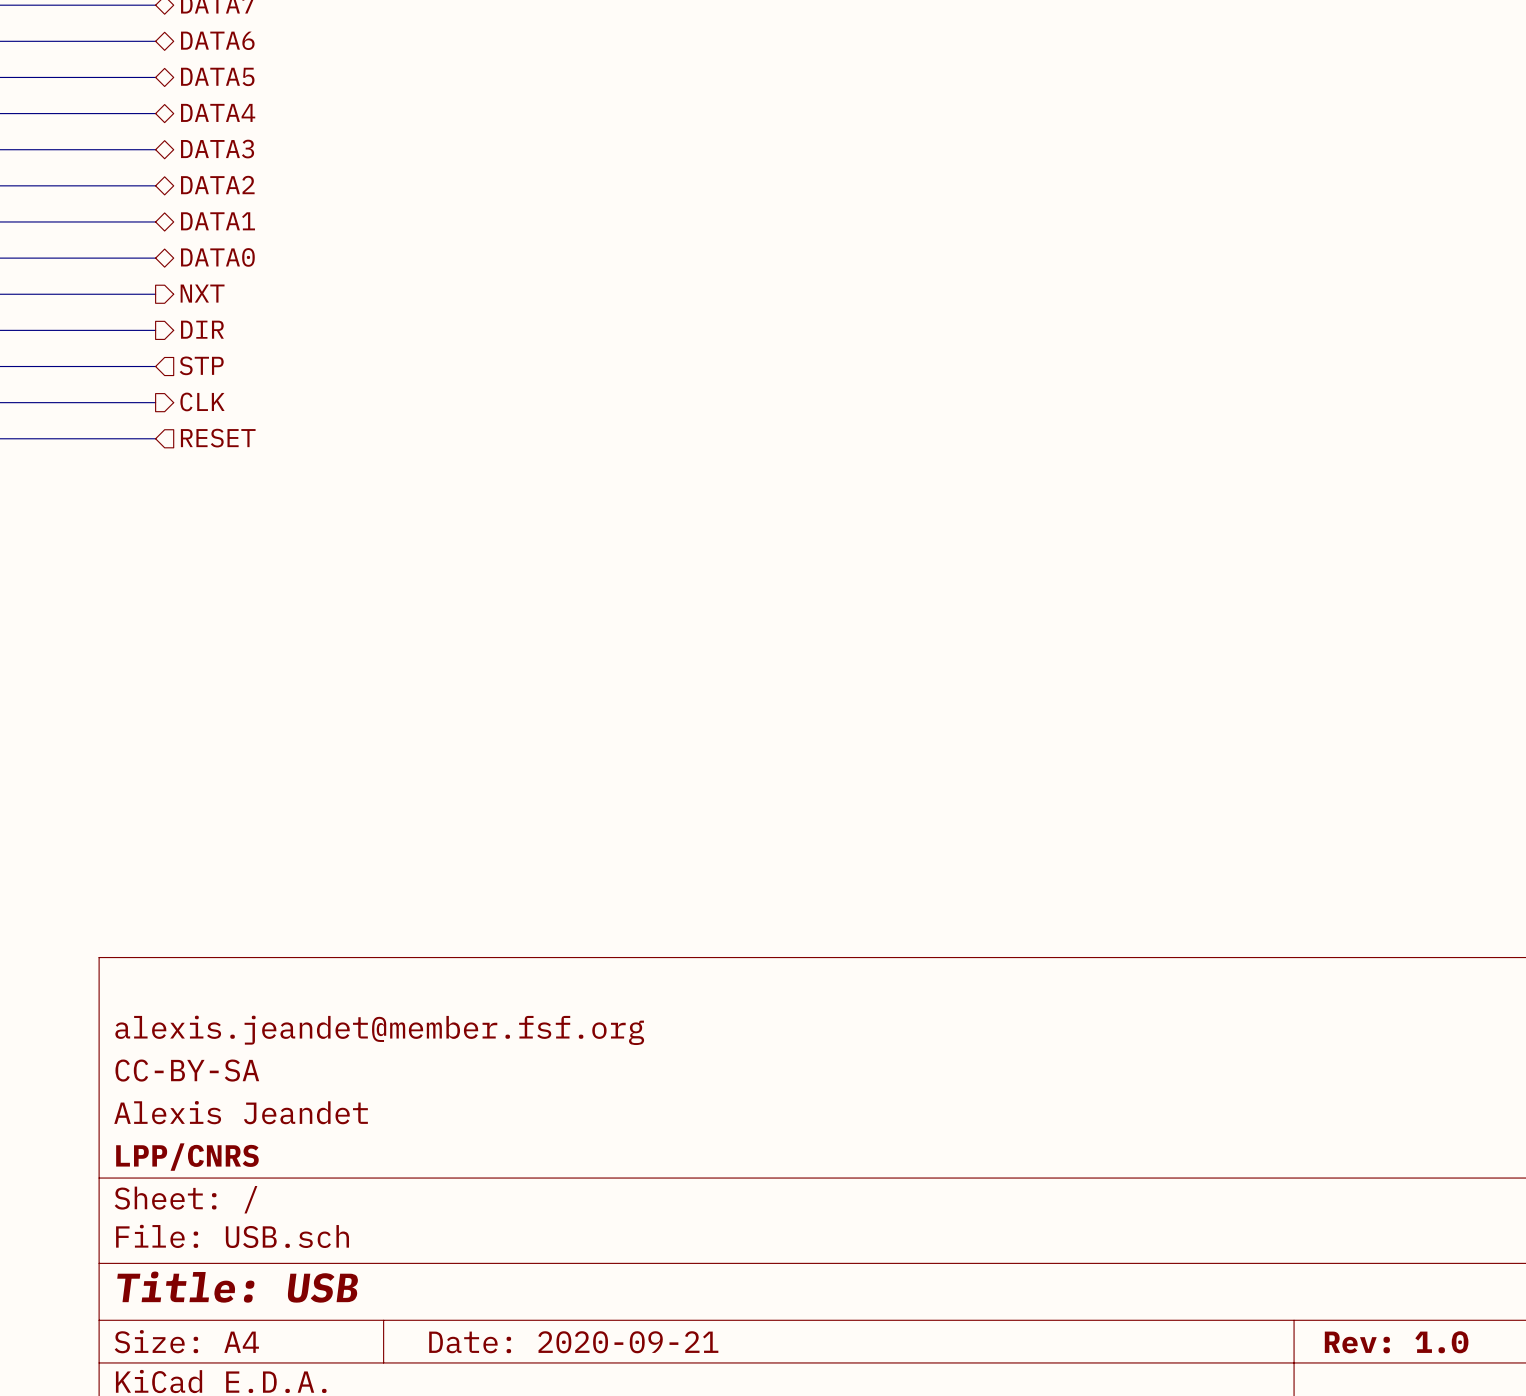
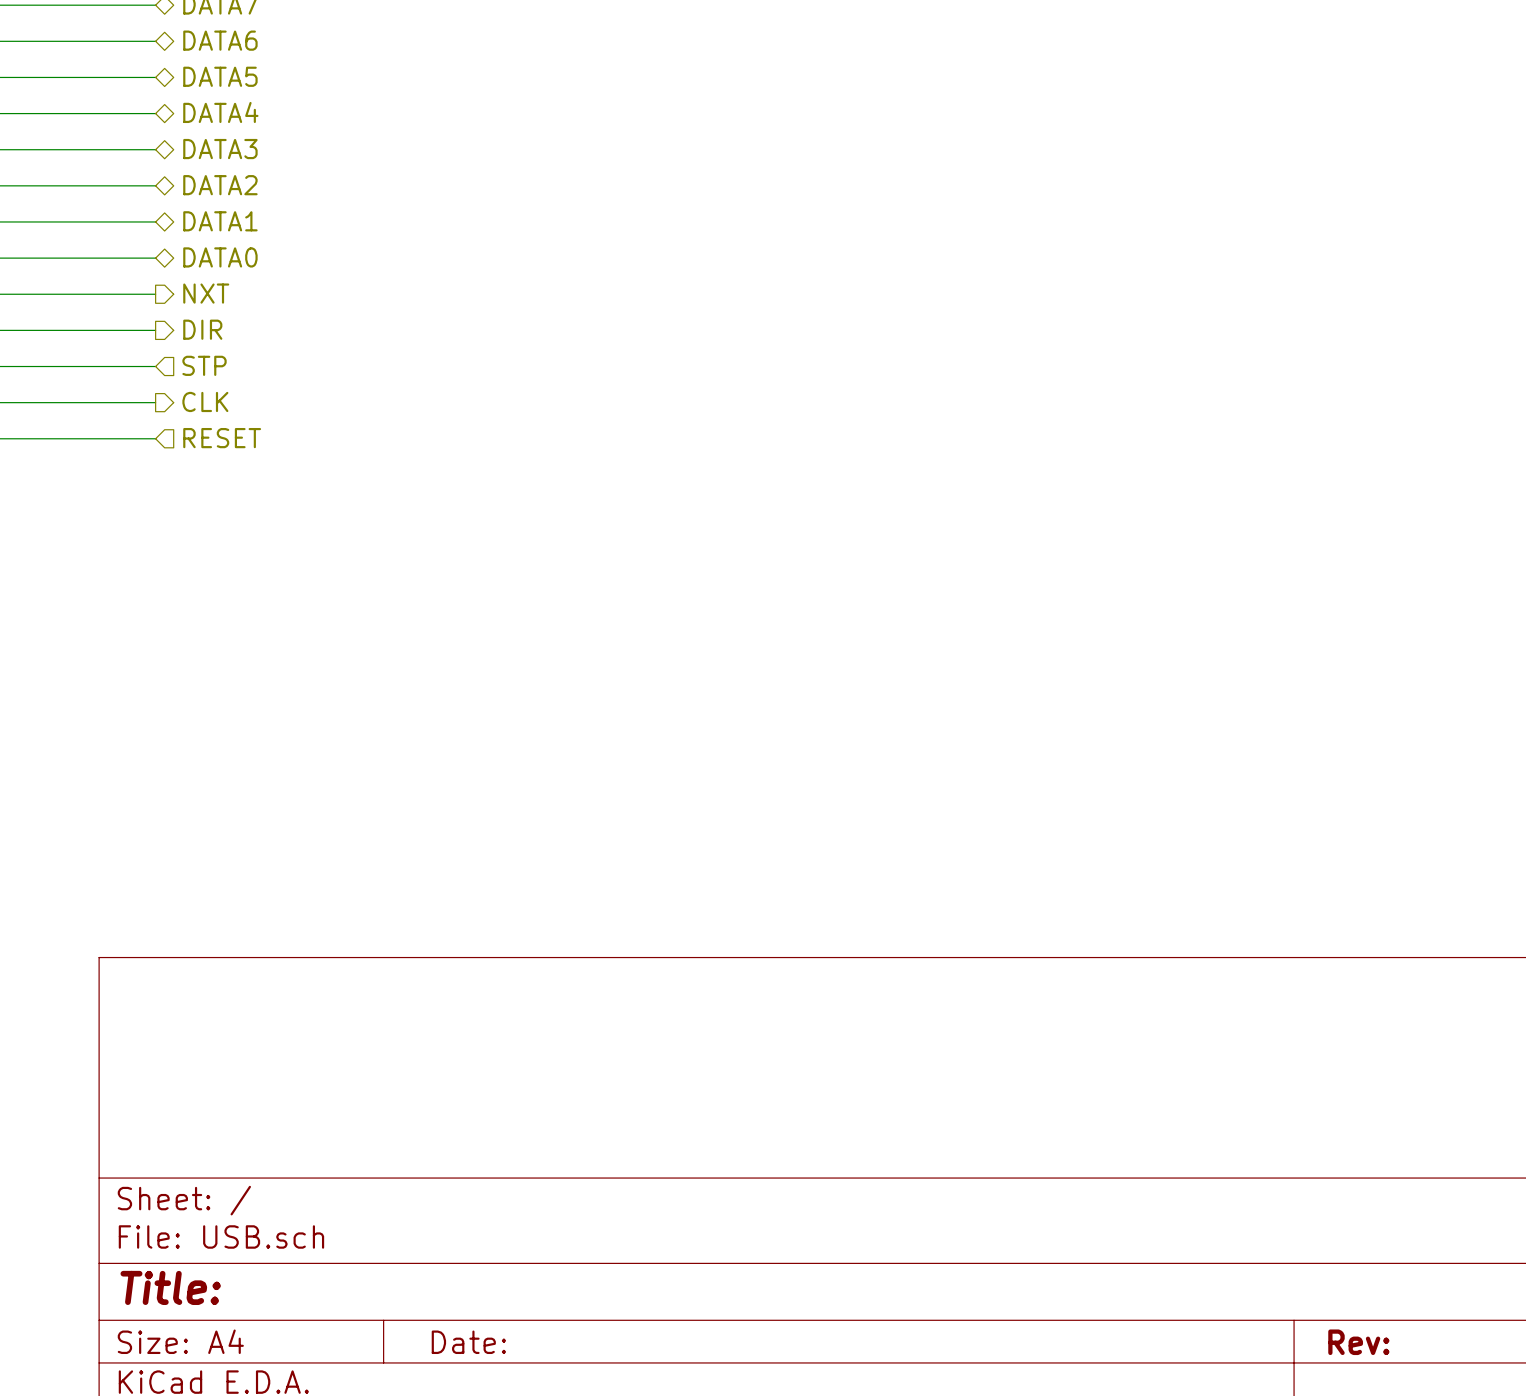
title block: alexis.jeandet@member.fsf.org (379, 1030) -> none
title block: CC-BY-SA (187, 1070) -> none
title block: Alexis Jeandet (241, 1112) -> none
title block: LPP/CNRS (187, 1157) -> none
title block: Title: USB (237, 1287) -> Title: (170, 1287)
title block: Date: 2020-09-21 (573, 1342) -> Date: (468, 1342)
title block: Rev: 1.0 (1396, 1342) -> Rev: (1358, 1342)

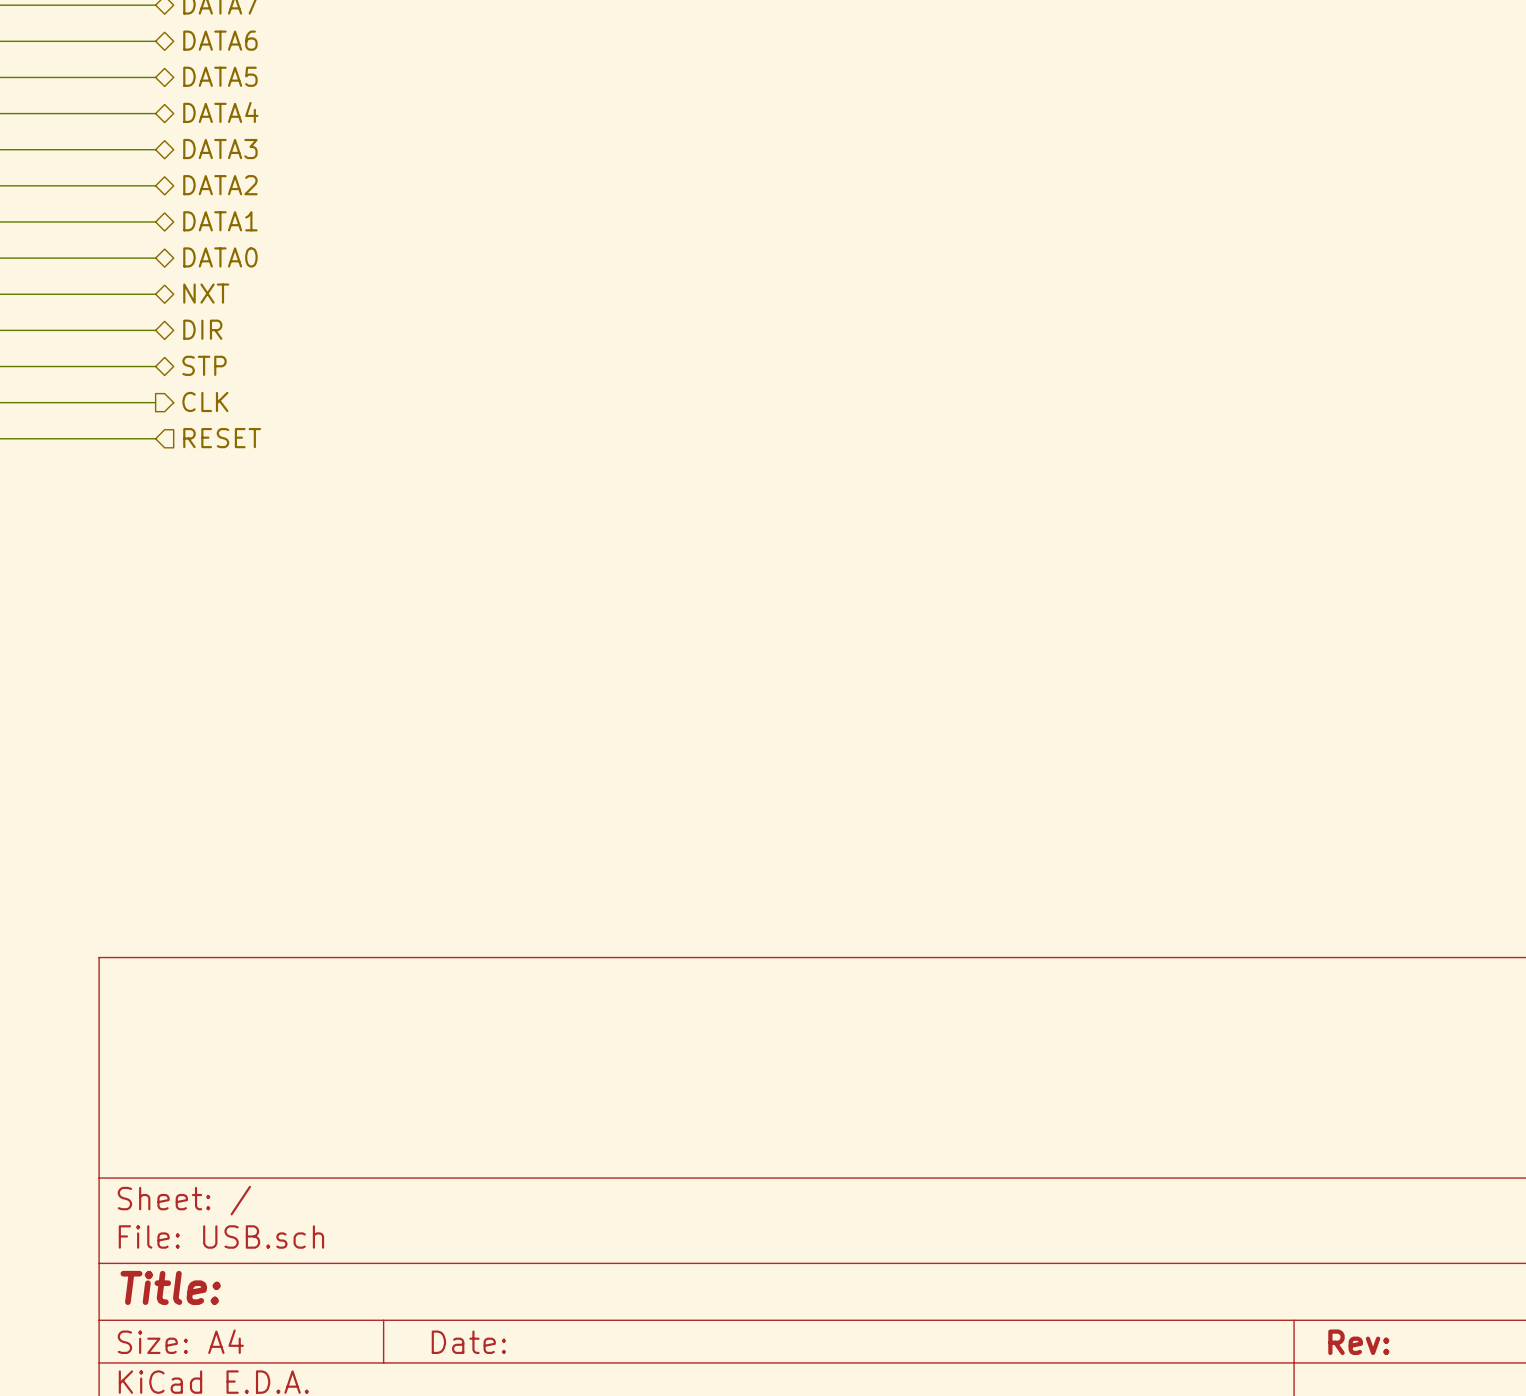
hierarchical label shape: output (206, 293) -> bidirectional (206, 293)
hierarchical label shape: output (202, 329) -> bidirectional (202, 329)
hierarchical label shape: input (204, 365) -> bidirectional (204, 365)

